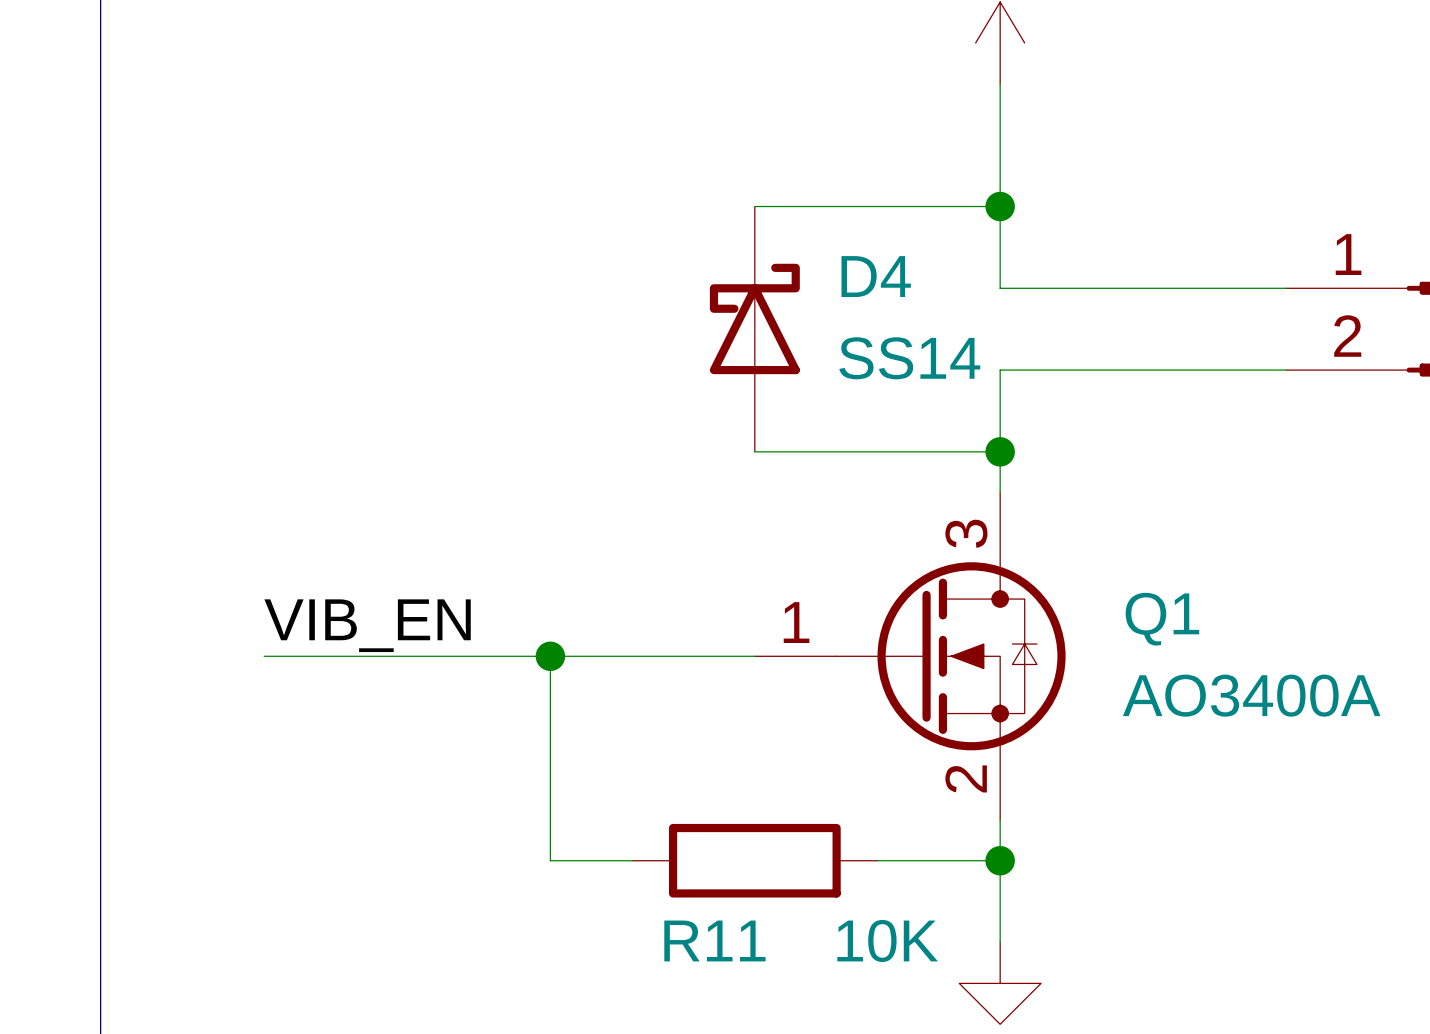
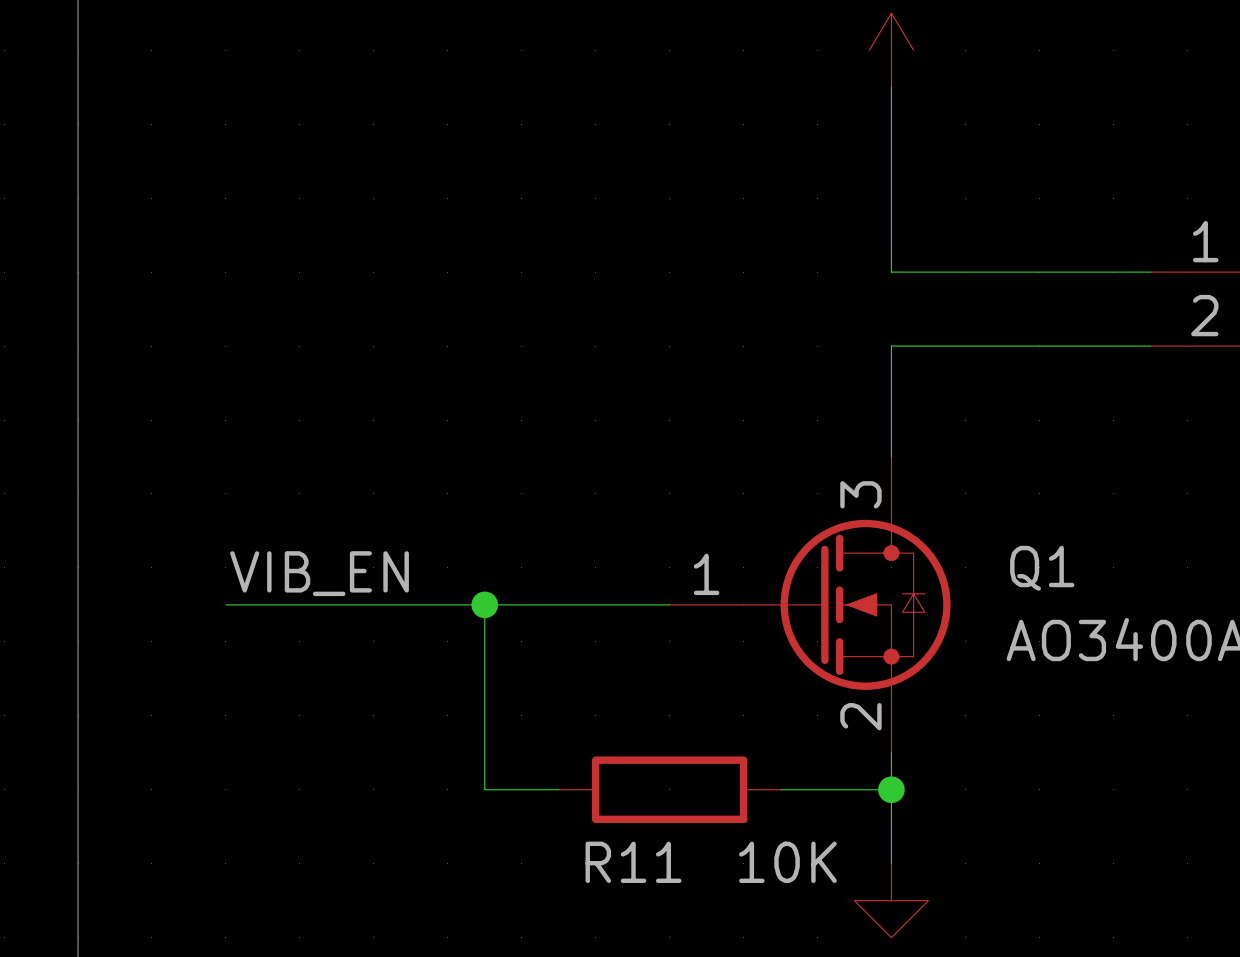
wire: (754, 206) (1000, 206) -> none
junction: (1000, 206) -> none
D4: SS14 (754, 329) -> none
wire: (754, 451) (1000, 451) -> none
junction: (1000, 451) -> none

